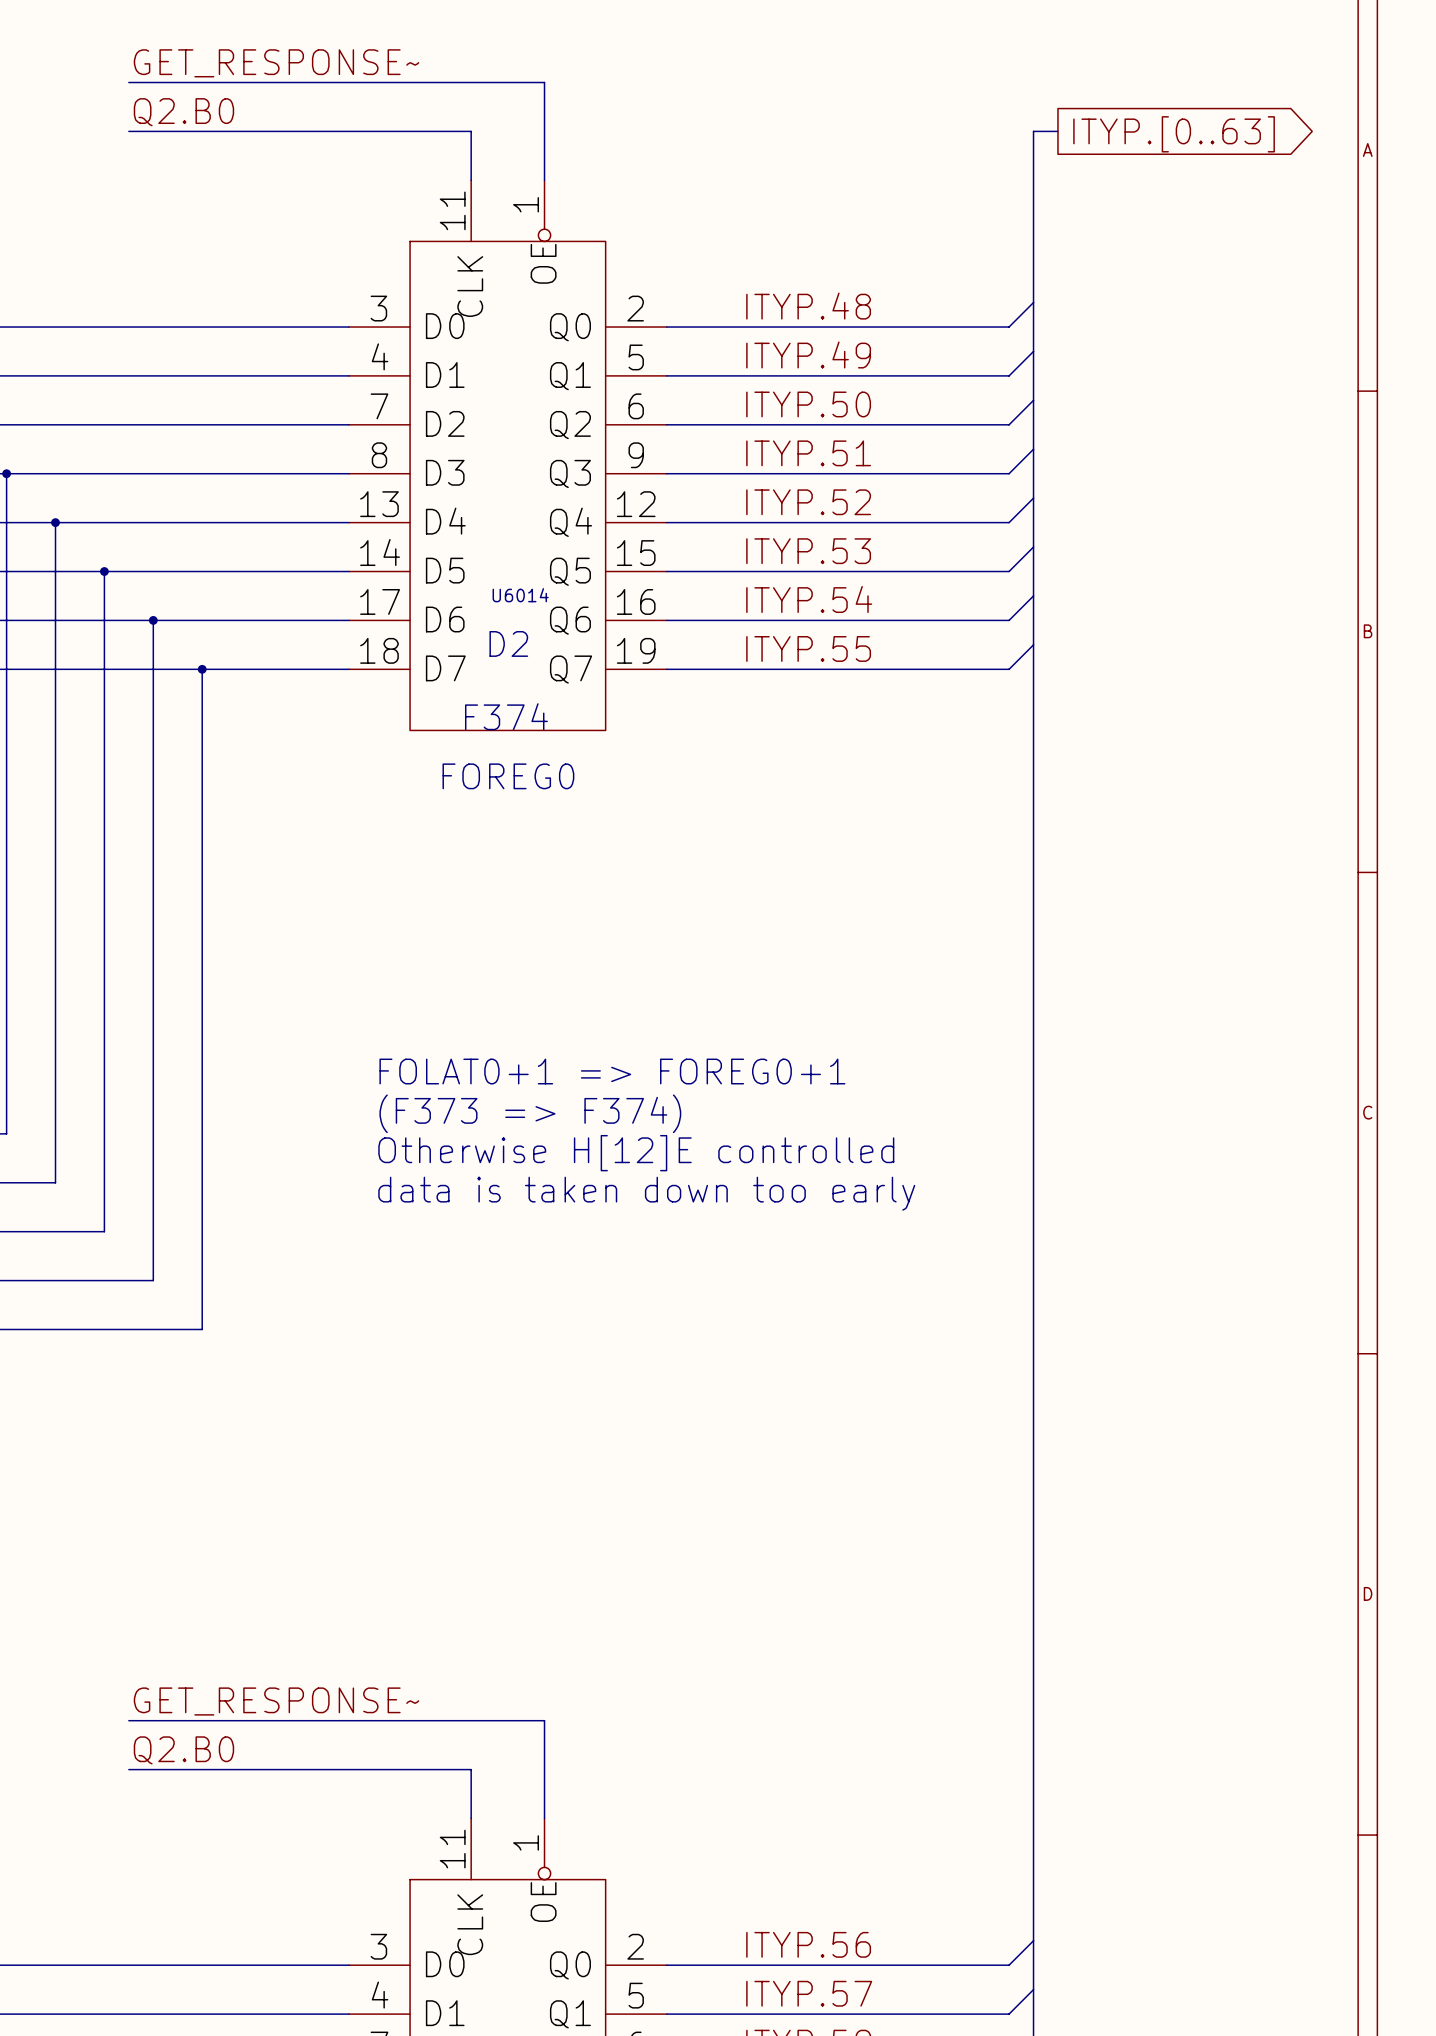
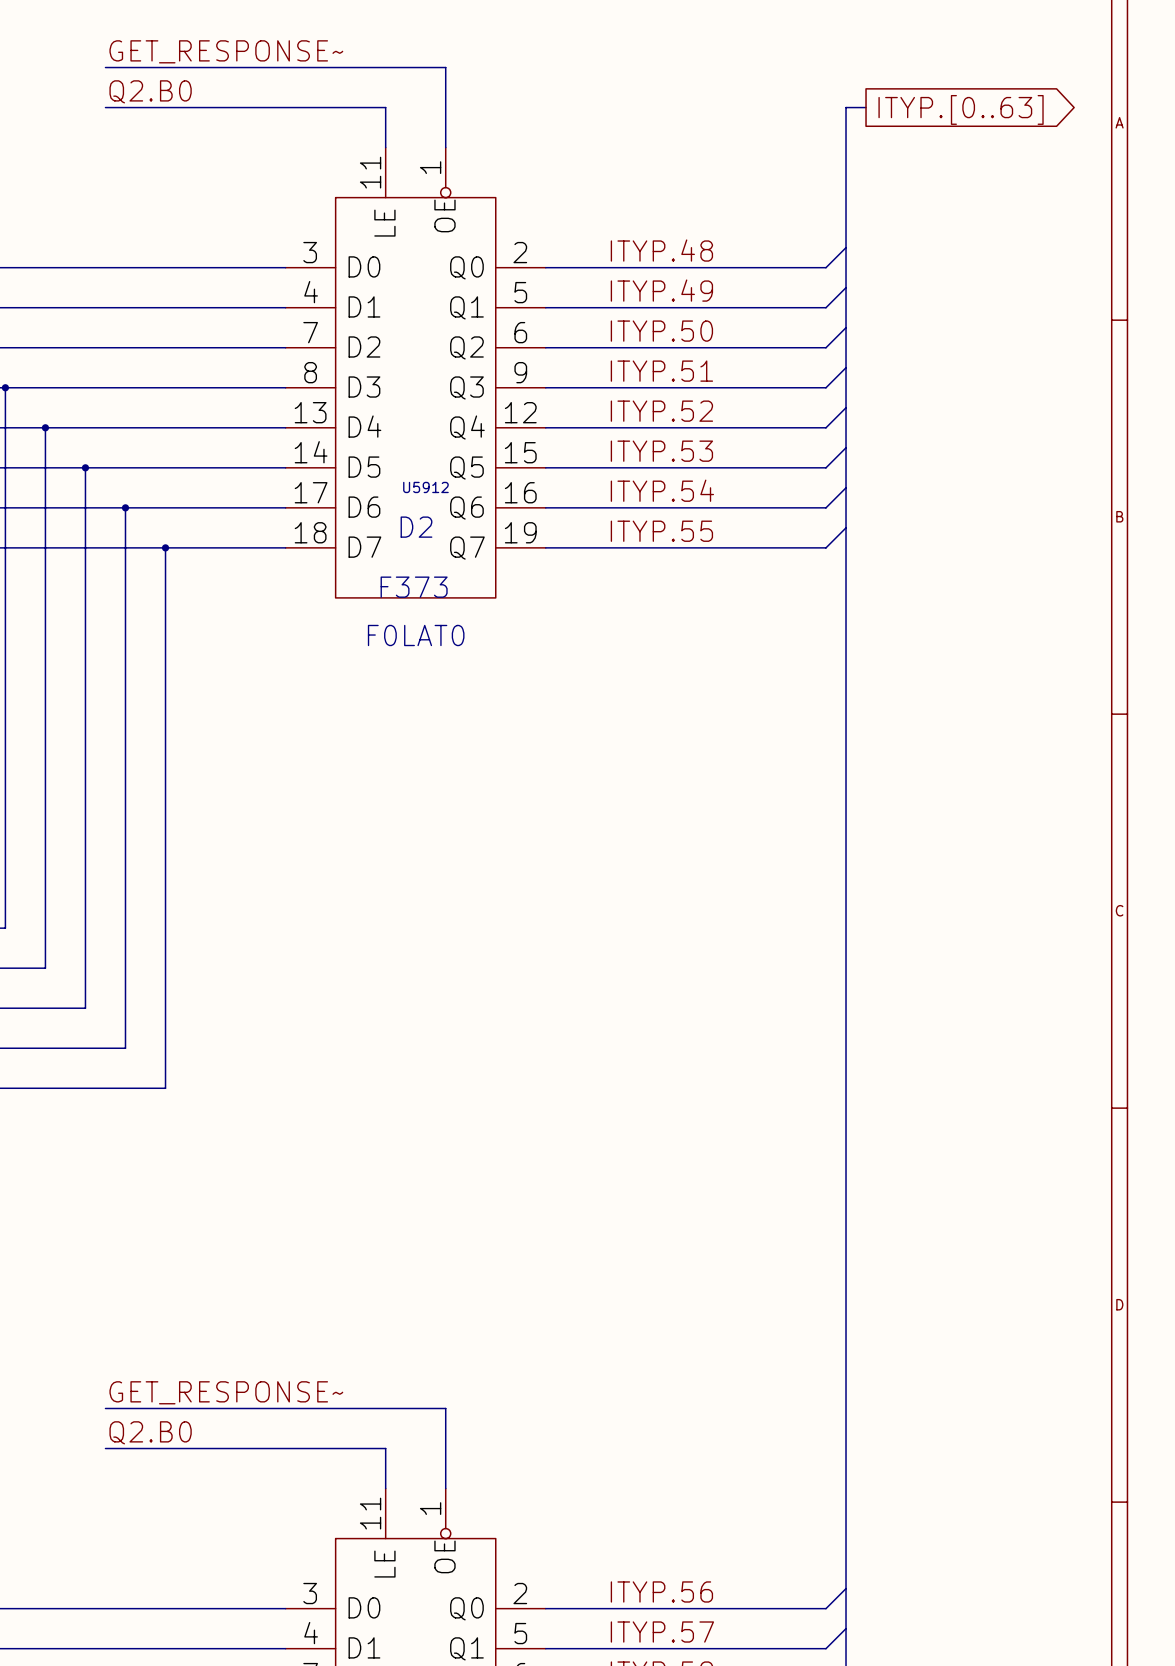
U6014 pin name: CLK (470, 286) -> LE (384, 223)
U6014 name: U6014 (520, 595) -> U5912 (425, 487)
U6014 value: F374 (506, 716) -> F373 (414, 587)
U6014 text: FOREG0 (508, 776) -> F0LAT0 (416, 635)
text: FOLAT0+1 => FOREG0+1 (612, 1071) -> none
text: (F373 => F374) (530, 1113) -> none
text: Otherwise H[12]E controlled (636, 1153) -> none
text: data is taken down too early (646, 1193) -> none
part pin name: CLK (470, 1924) -> LE (384, 1564)

